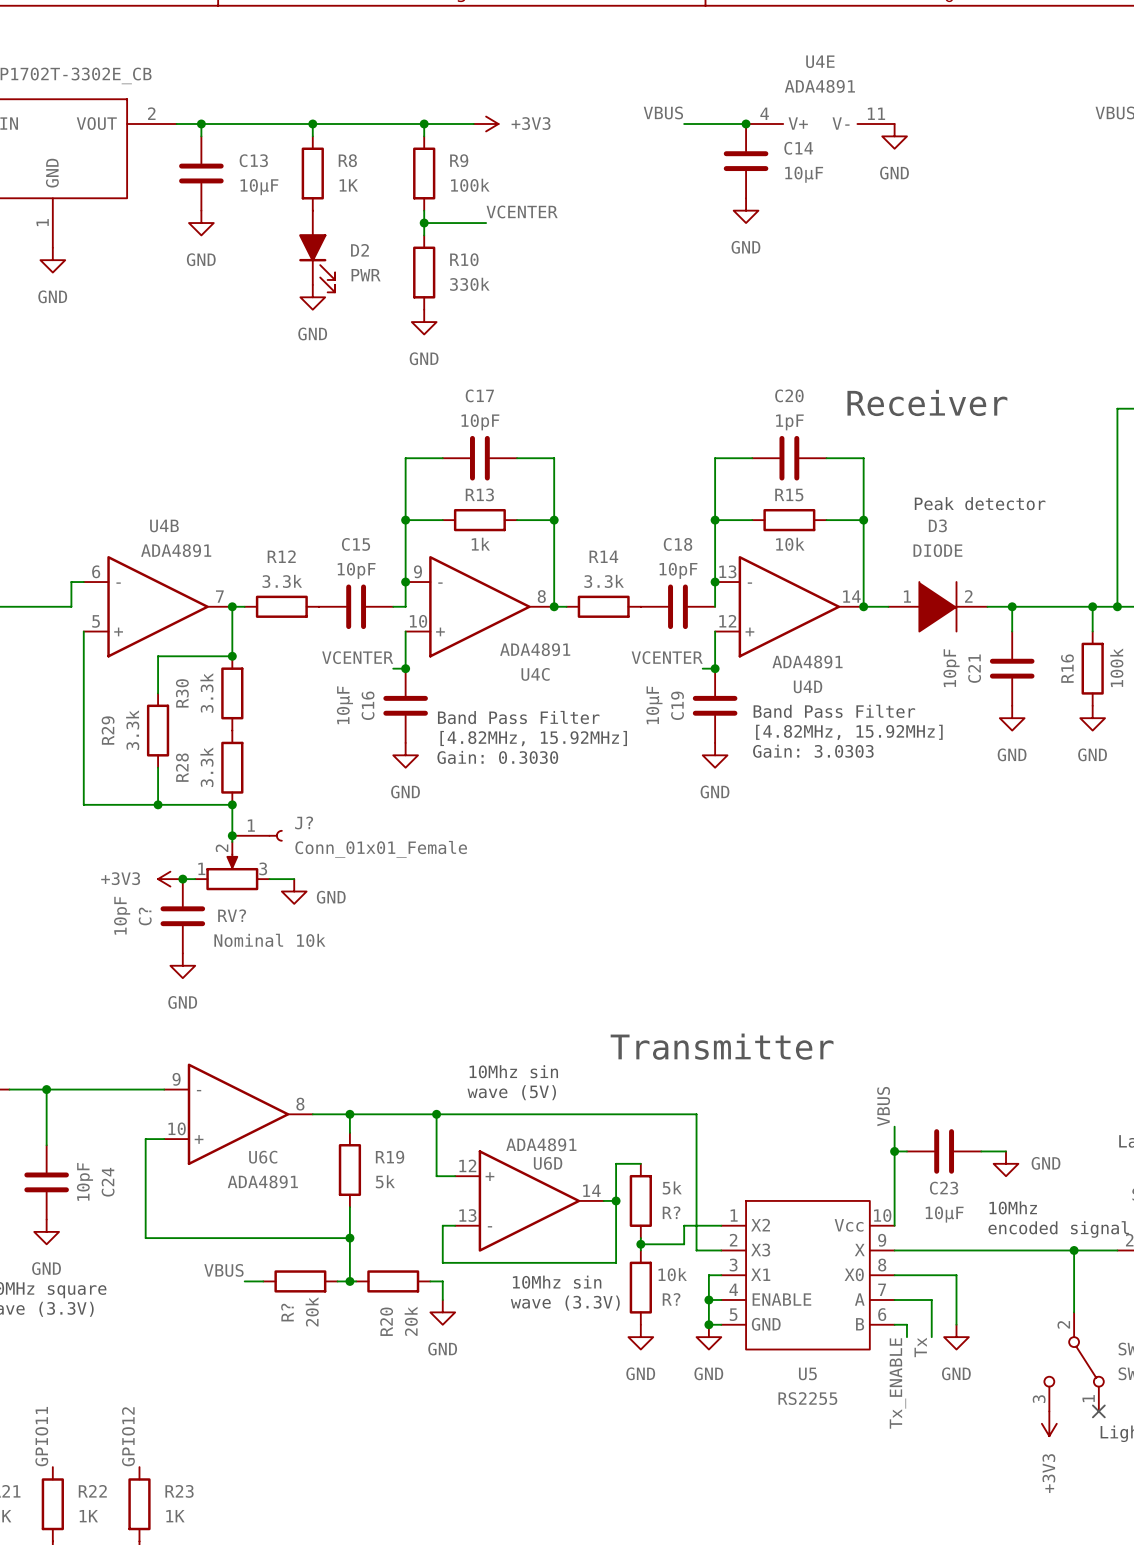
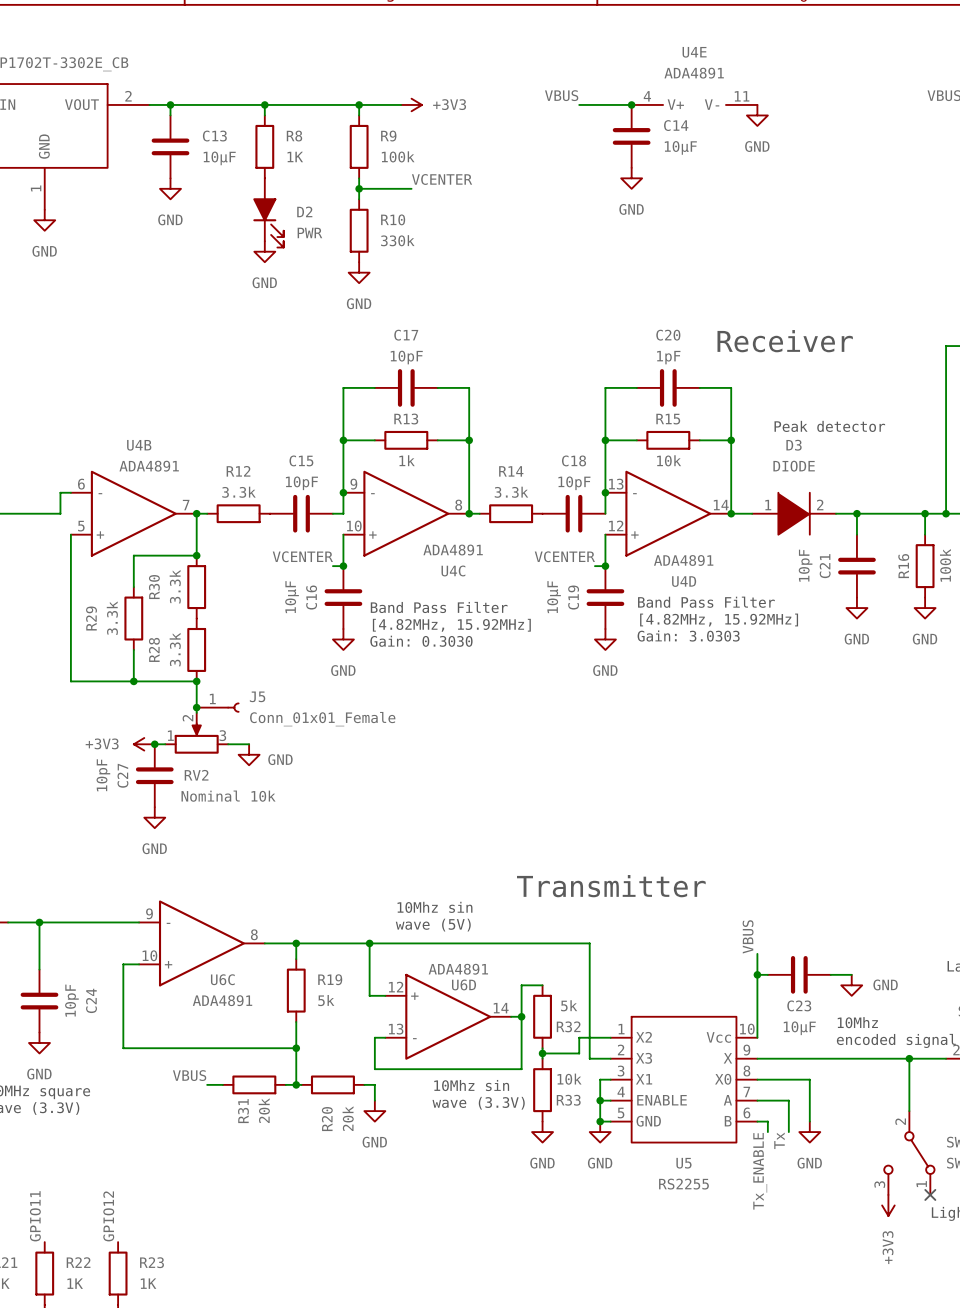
J? name: J? (304, 822) -> J5 (257, 696)
RV? name: RV? (232, 915) -> RV2 (196, 775)
C? name: C? (145, 916) -> C27 (122, 775)
R? name: R? (671, 1212) -> R32 (568, 1026)
R? name: R? (671, 1299) -> R33 (568, 1100)
R? name: R? (287, 1312) -> R31 (243, 1111)

